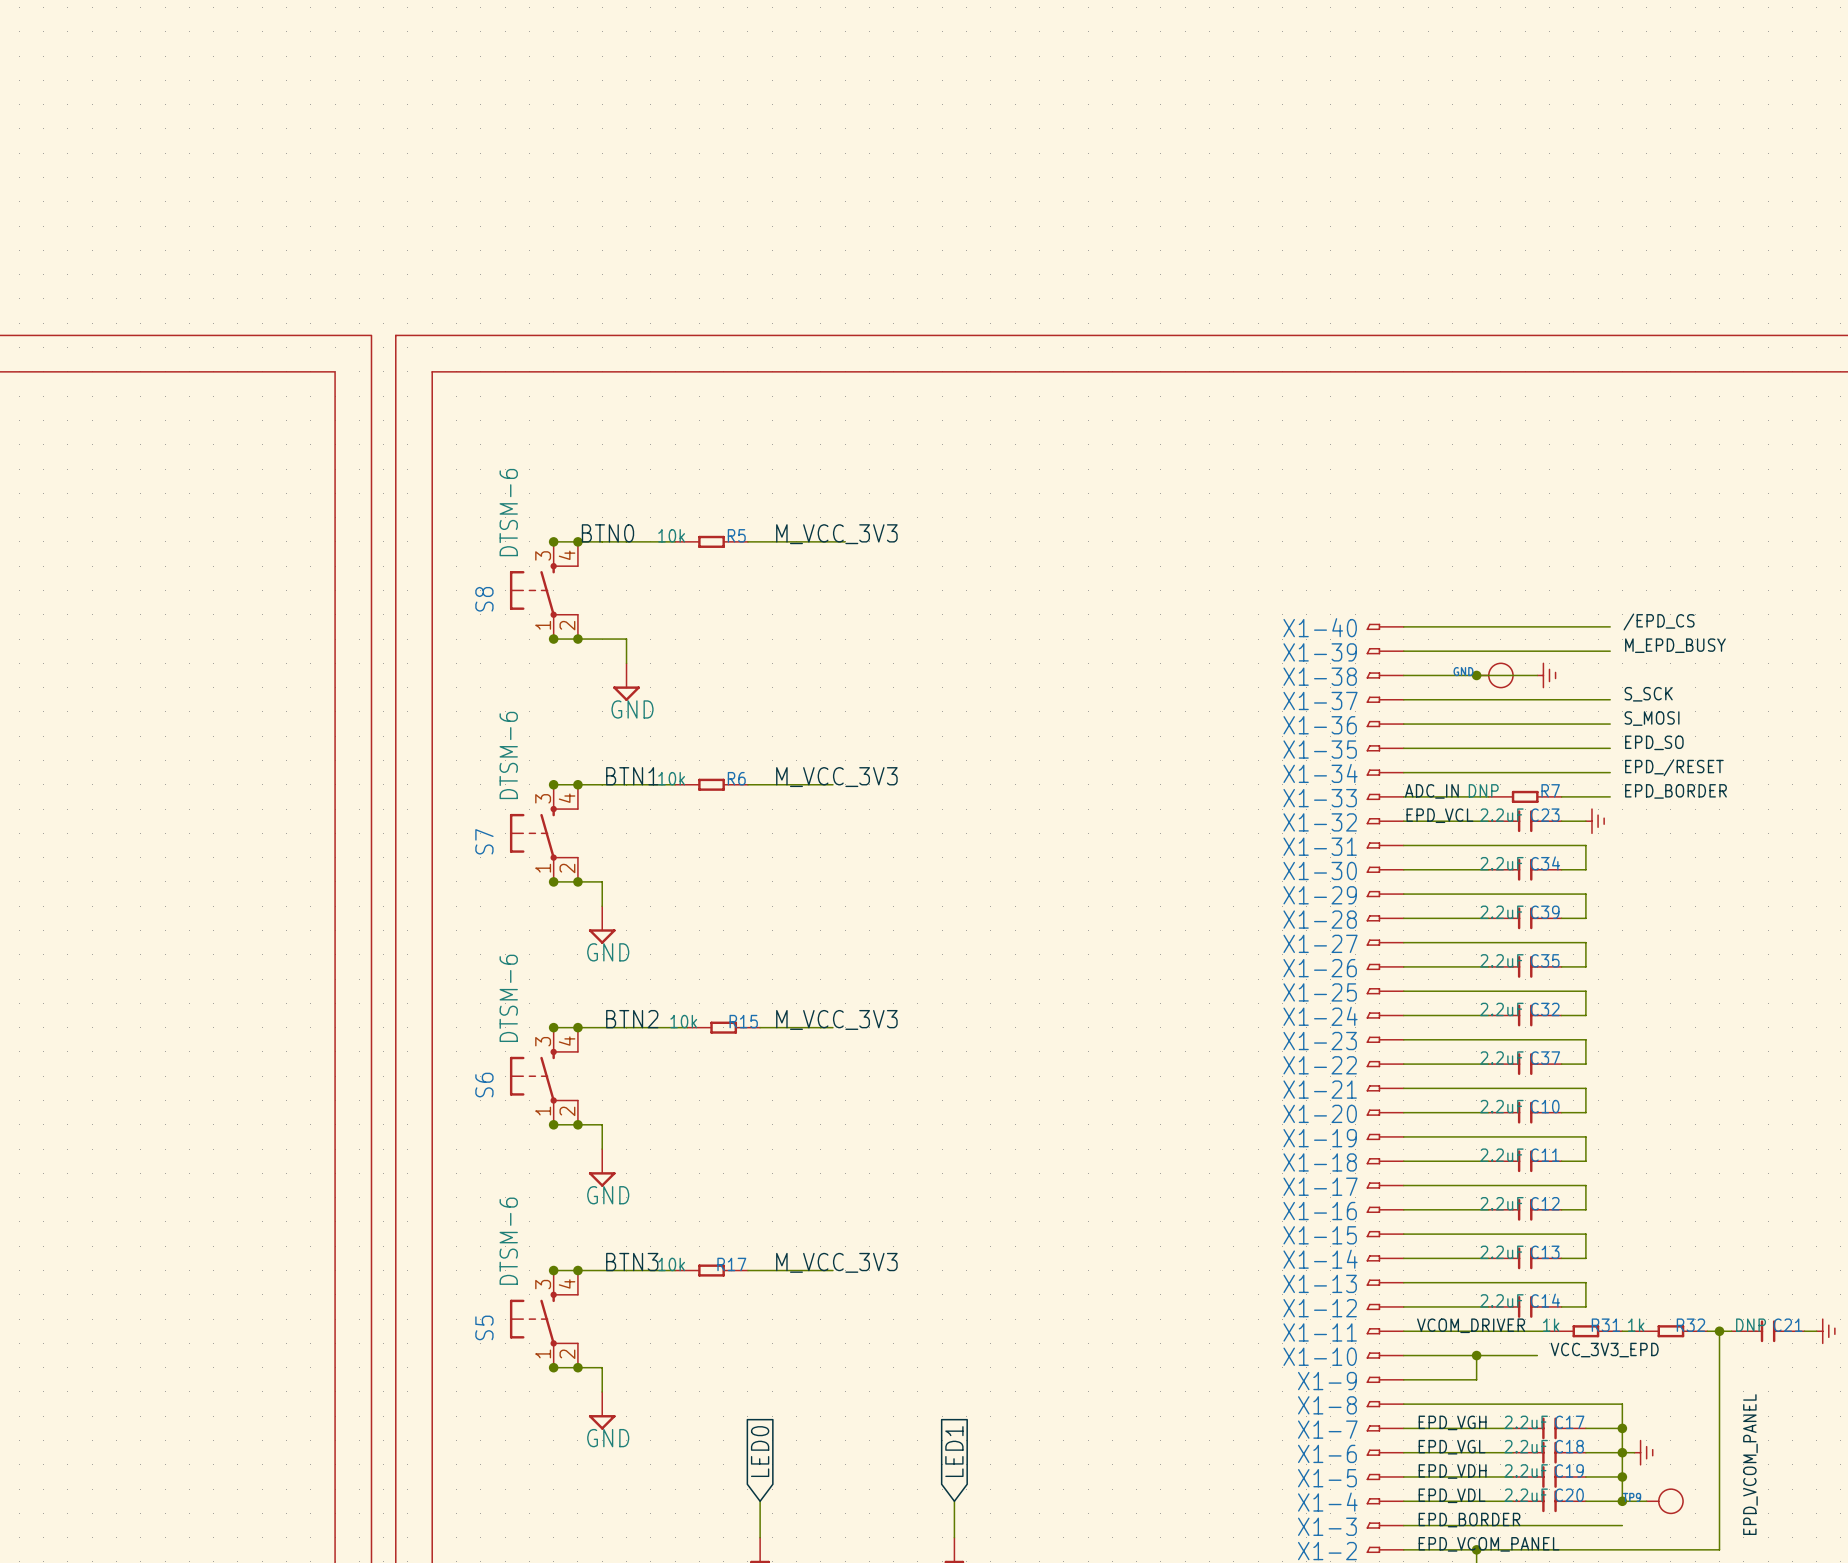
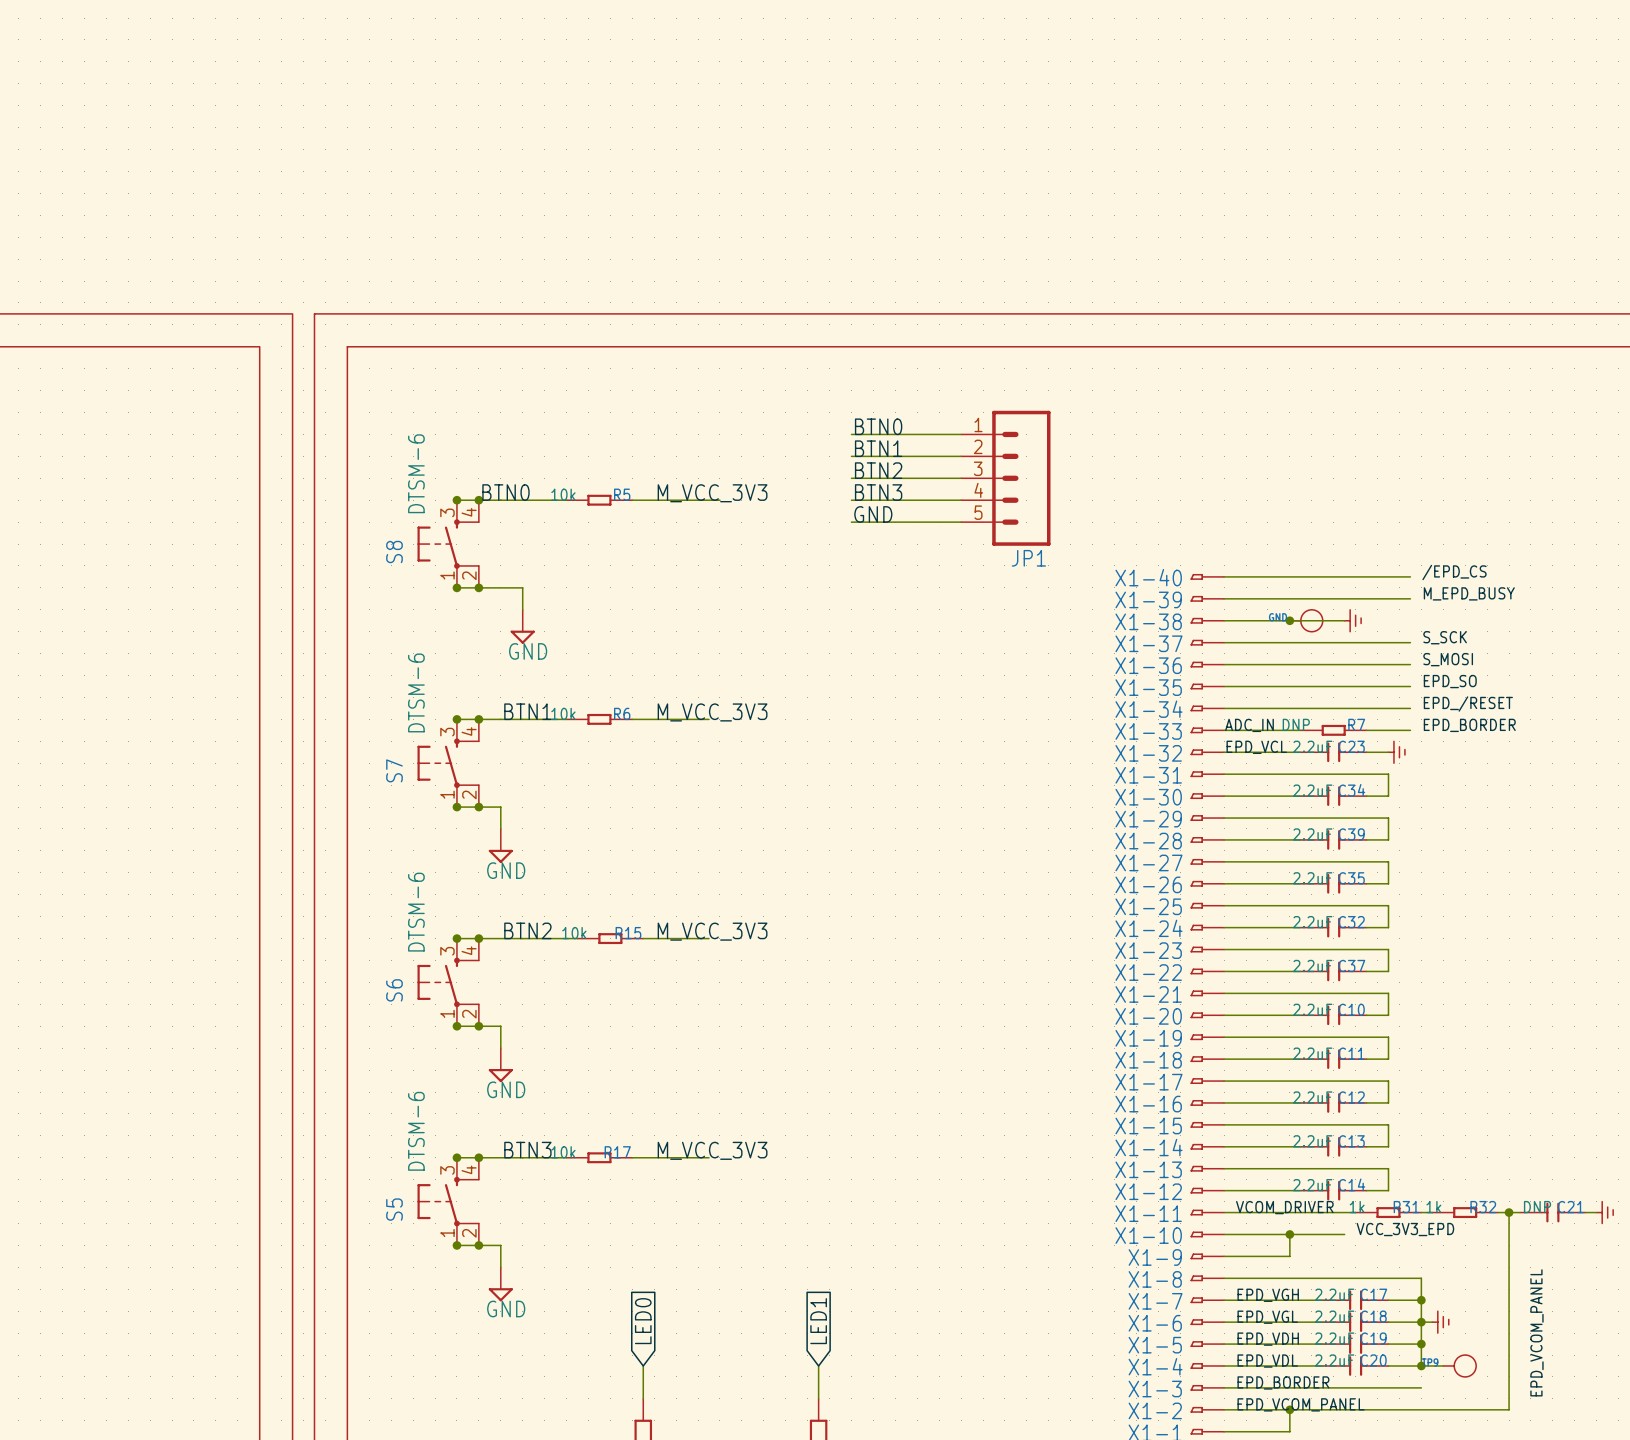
label: none -> BTN0 (878, 426)
wire: none -> (851, 434) (961, 434)
label: none -> BTN1 (878, 448)
wire: none -> (851, 456) (961, 456)
label: none -> BTN2 (878, 470)
wire: none -> (851, 478) (961, 478)
JP1: none -> (1005, 478)
label: none -> BTN3 (878, 492)
wire: none -> (851, 500) (961, 500)
label: none -> GND (873, 514)
wire: none -> (851, 522) (961, 522)

